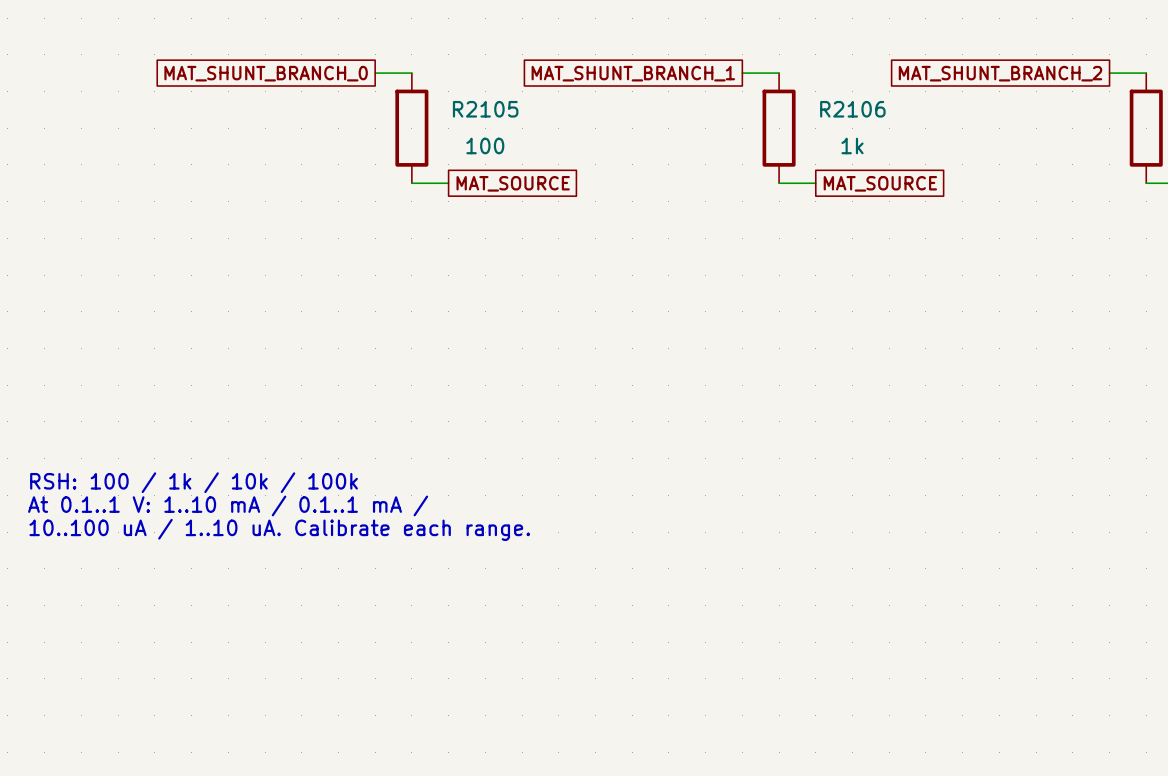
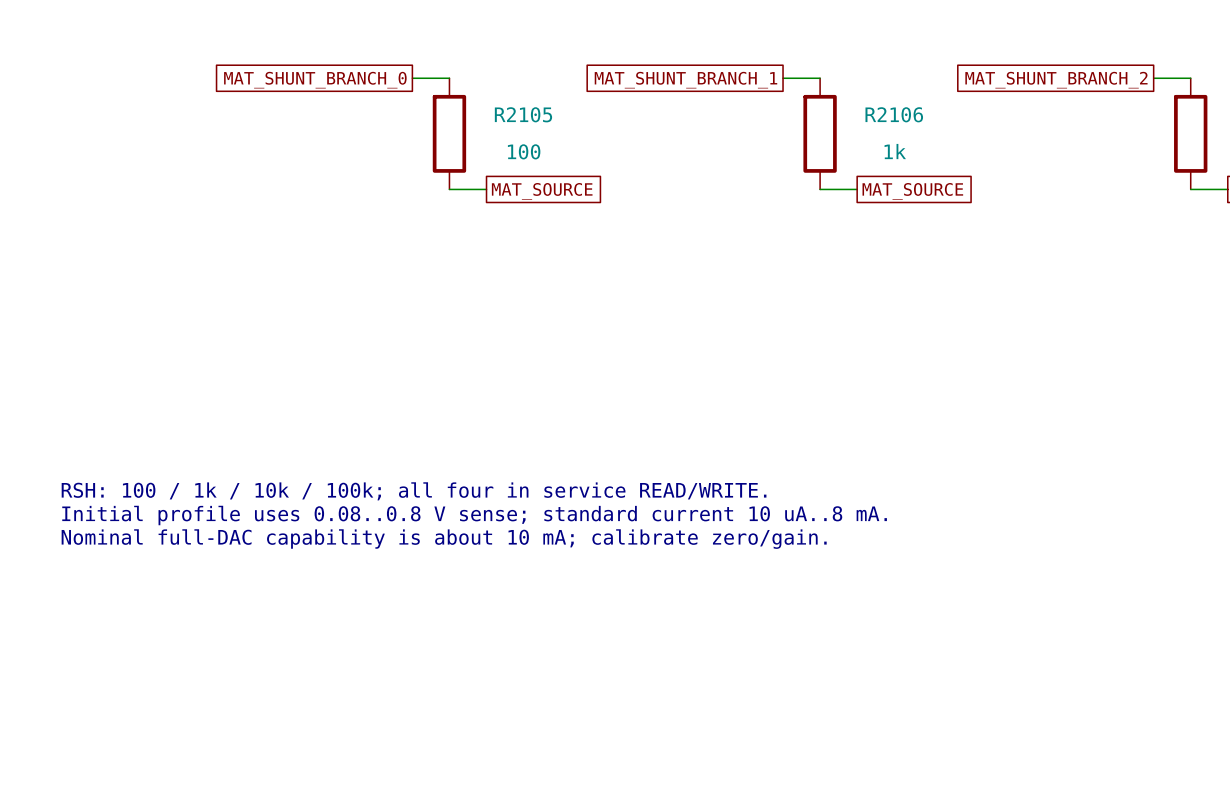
text: RSH: 100 / 1k / 10k / 100k (194, 482) -> RSH: 100 / 1k / 10k / 100k; all four in service READ/WRITE. (414, 491)
text: At 0.1..1 V: 1..10 mA / 0.1..1 mA / (228, 505) -> Initial profile uses 0.08..0.8 V sense; standard current 10 uA..8 mA. (474, 515)
text: 10..100 uA / 1..10 uA. Calibrate each range. (279, 529) -> Nominal full-DAC capability is about 10 mA; calibrate zero/gain. (444, 539)

